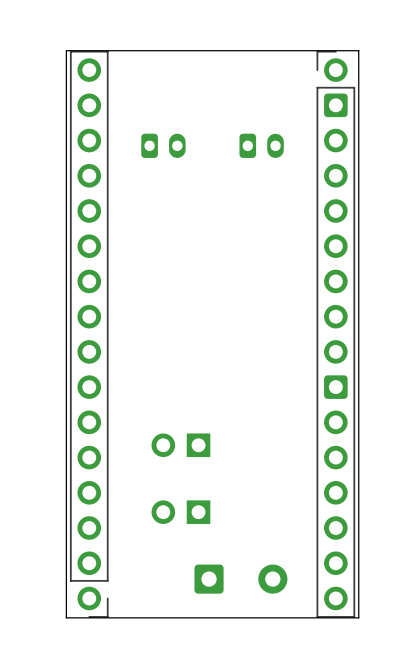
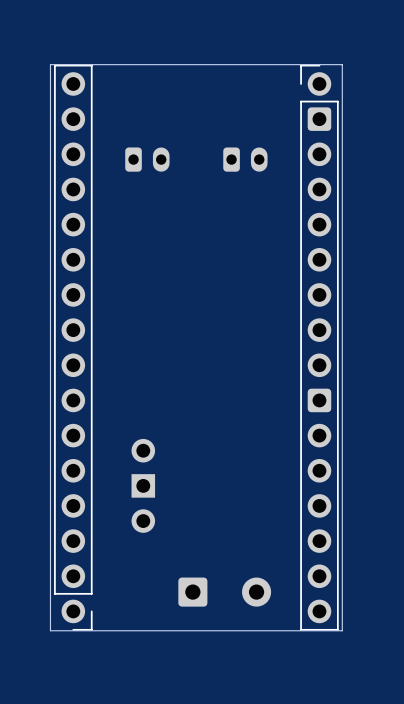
part: (180, 445) -> none
part: none -> (143, 485)
part: (180, 512) -> none

